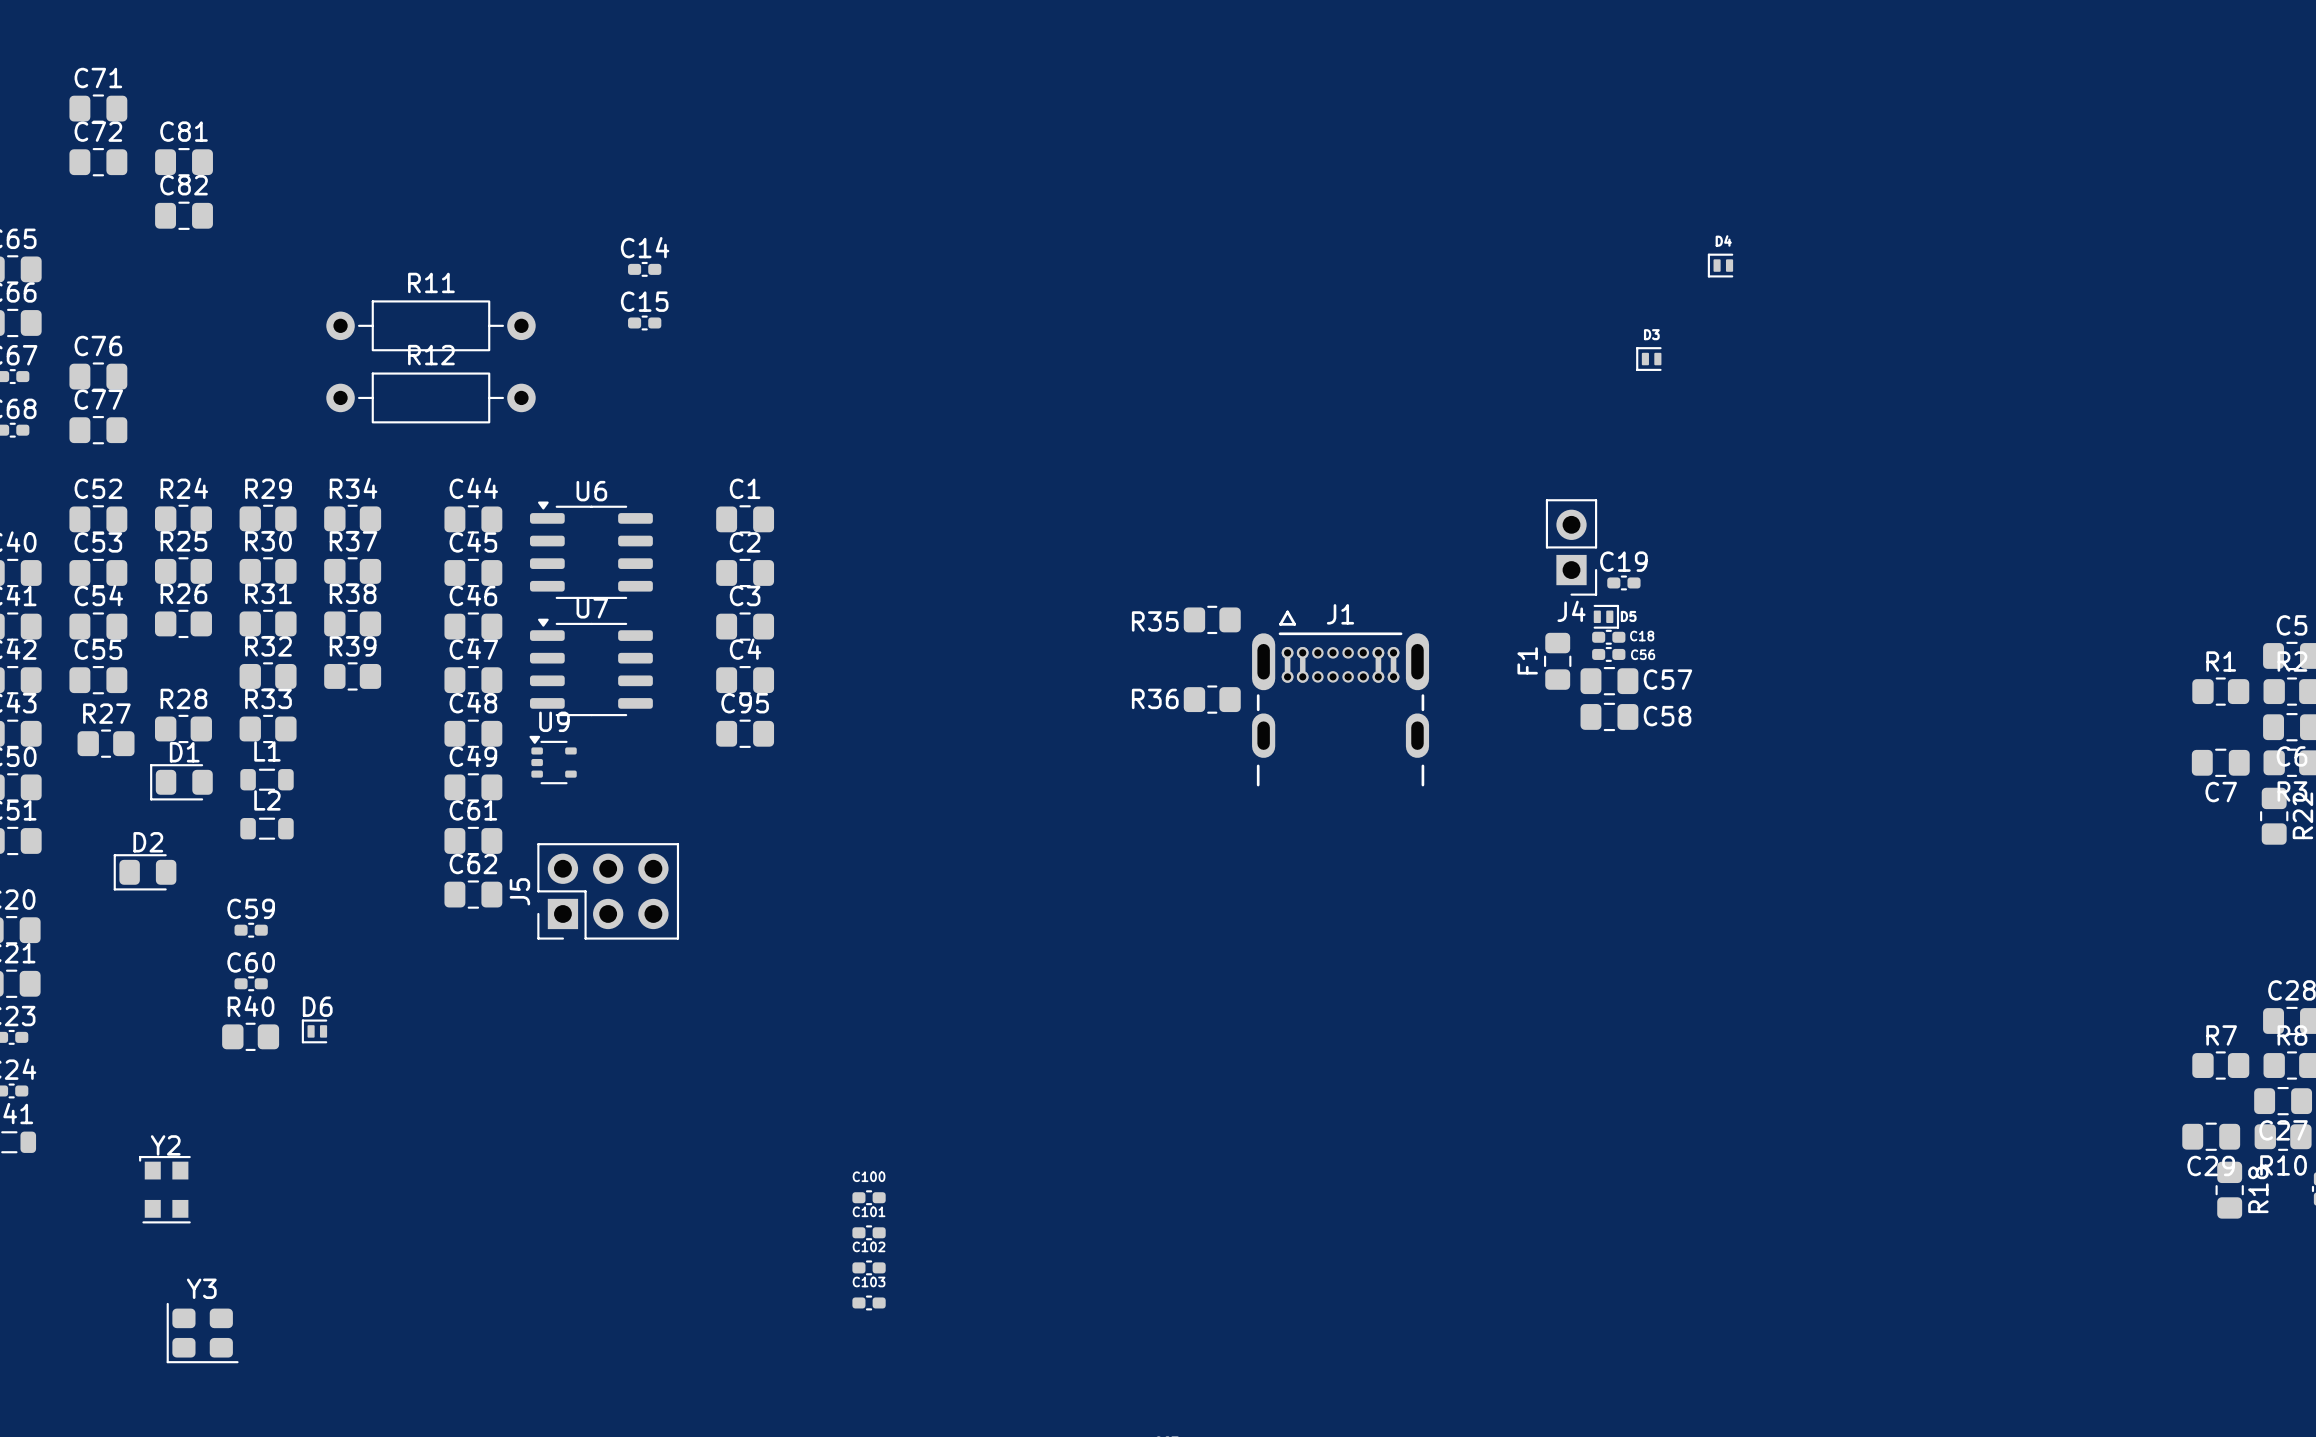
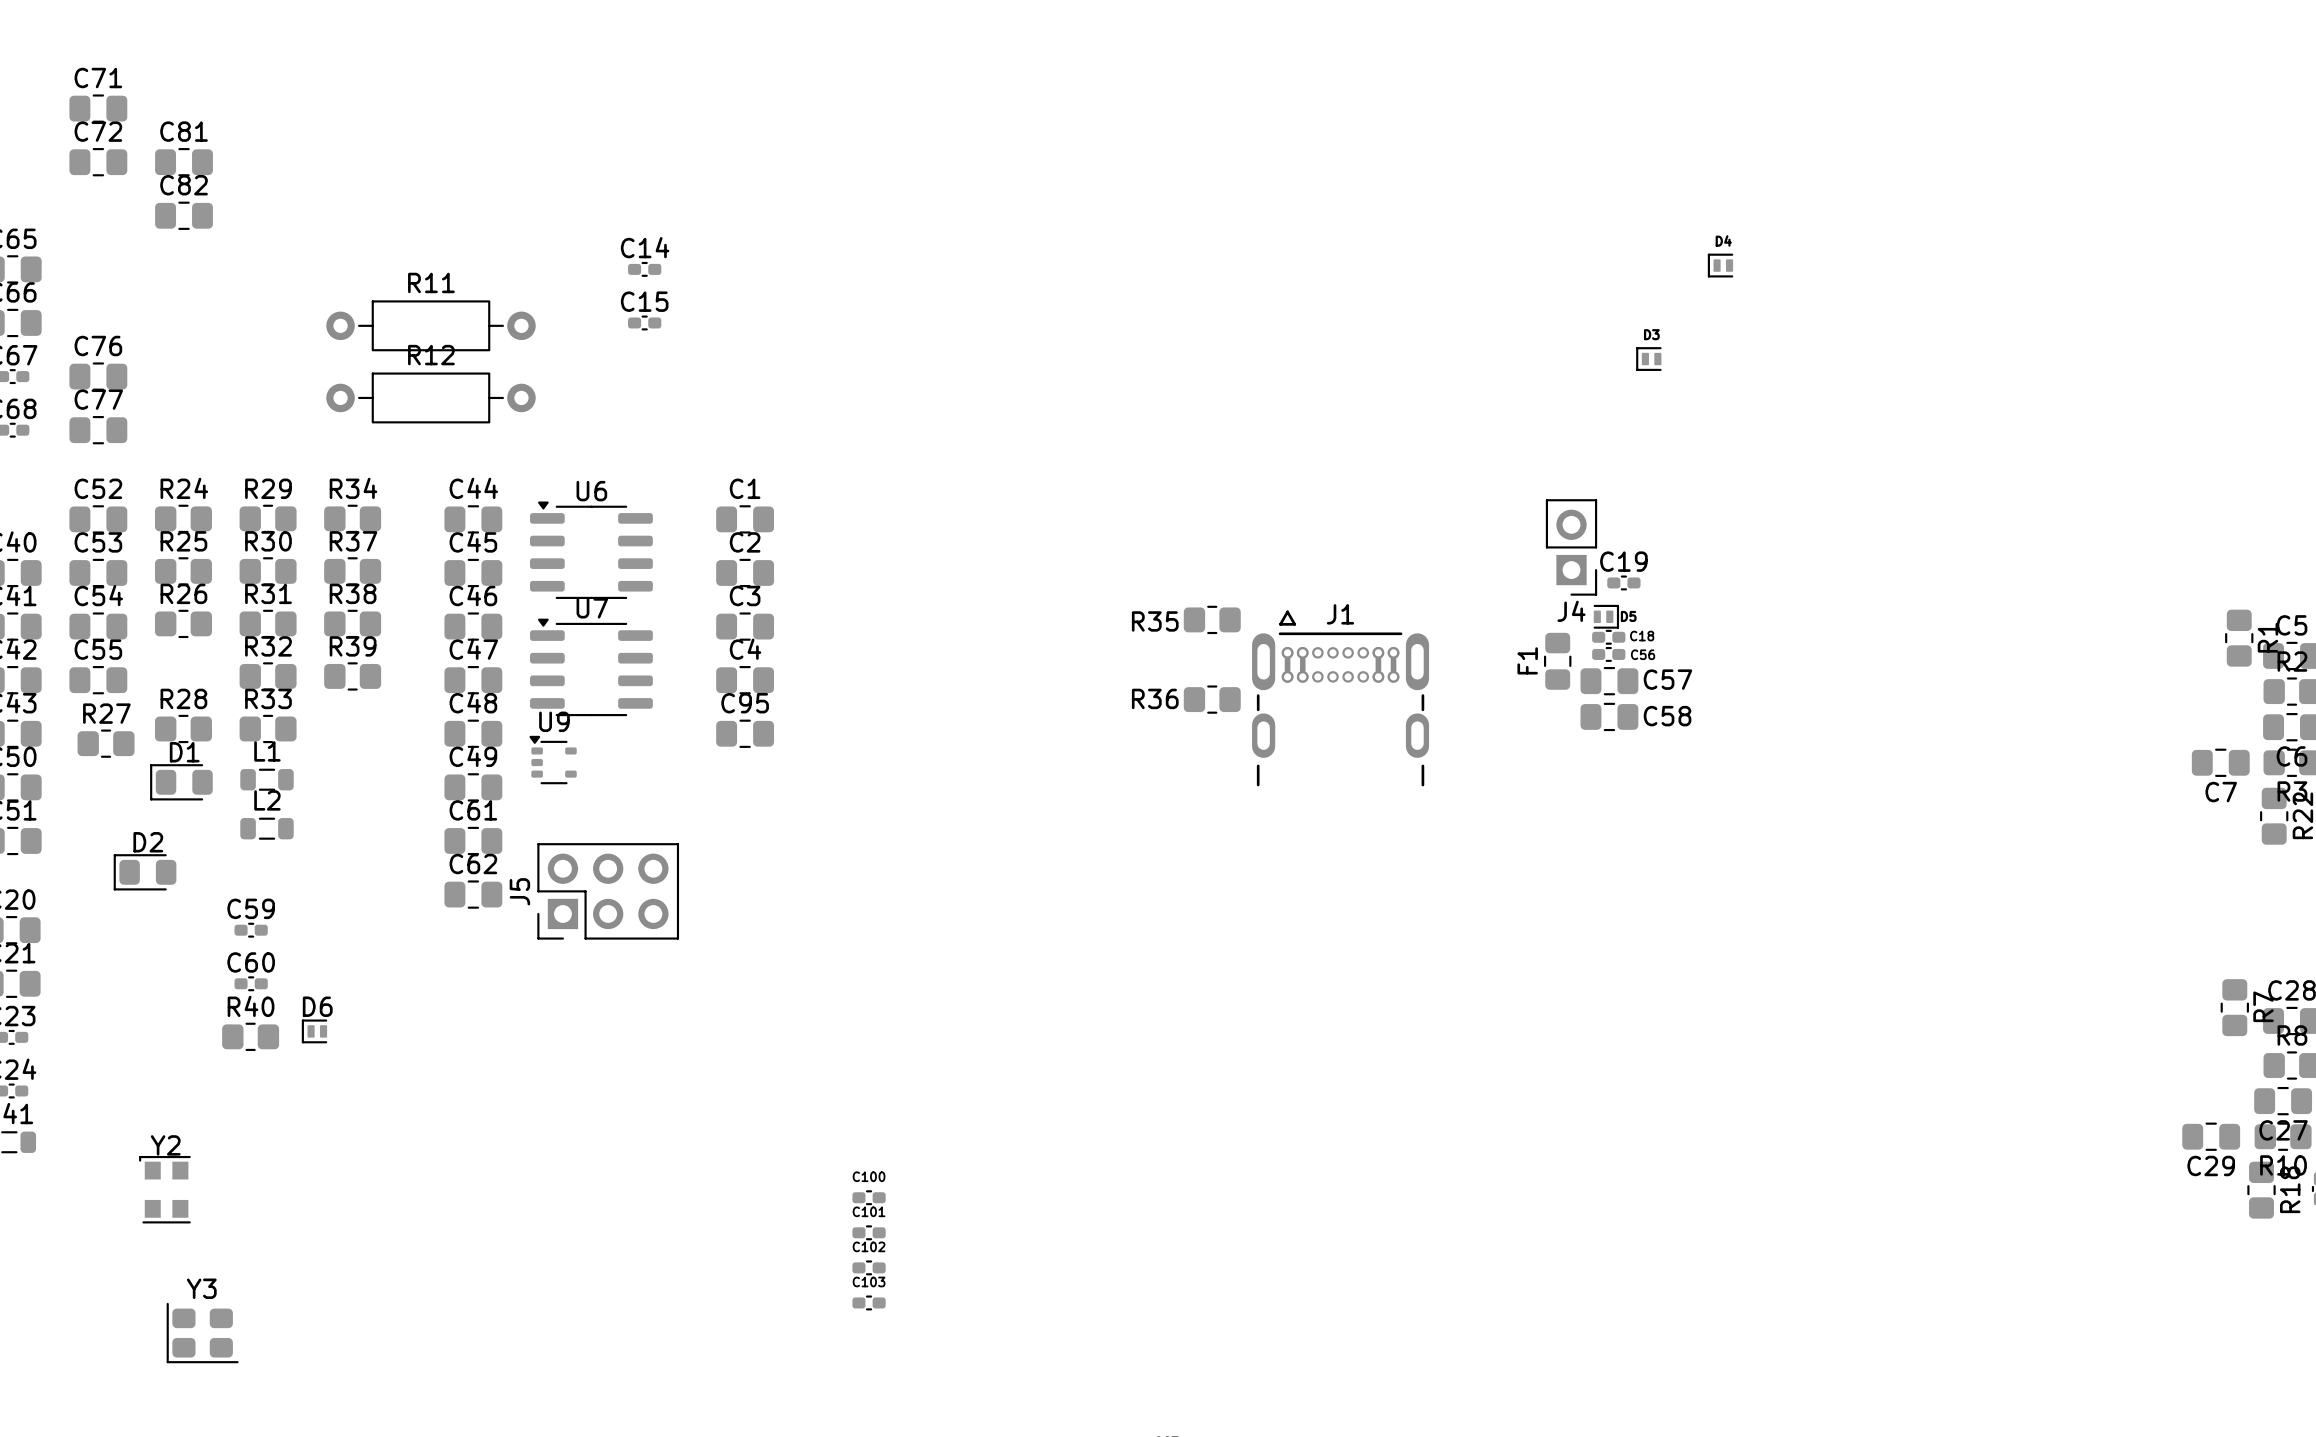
R1 rotation: 0° (2220, 691) -> 90° clockwise (2239, 638)
R1 position: (2220, 691) -> (2239, 638)
R7 rotation: 0° (2220, 1065) -> 90° clockwise (2234, 1007)
R7 position: (2220, 1065) -> (2234, 1007)
R18 position: (2229, 1190) -> (2261, 1190)

